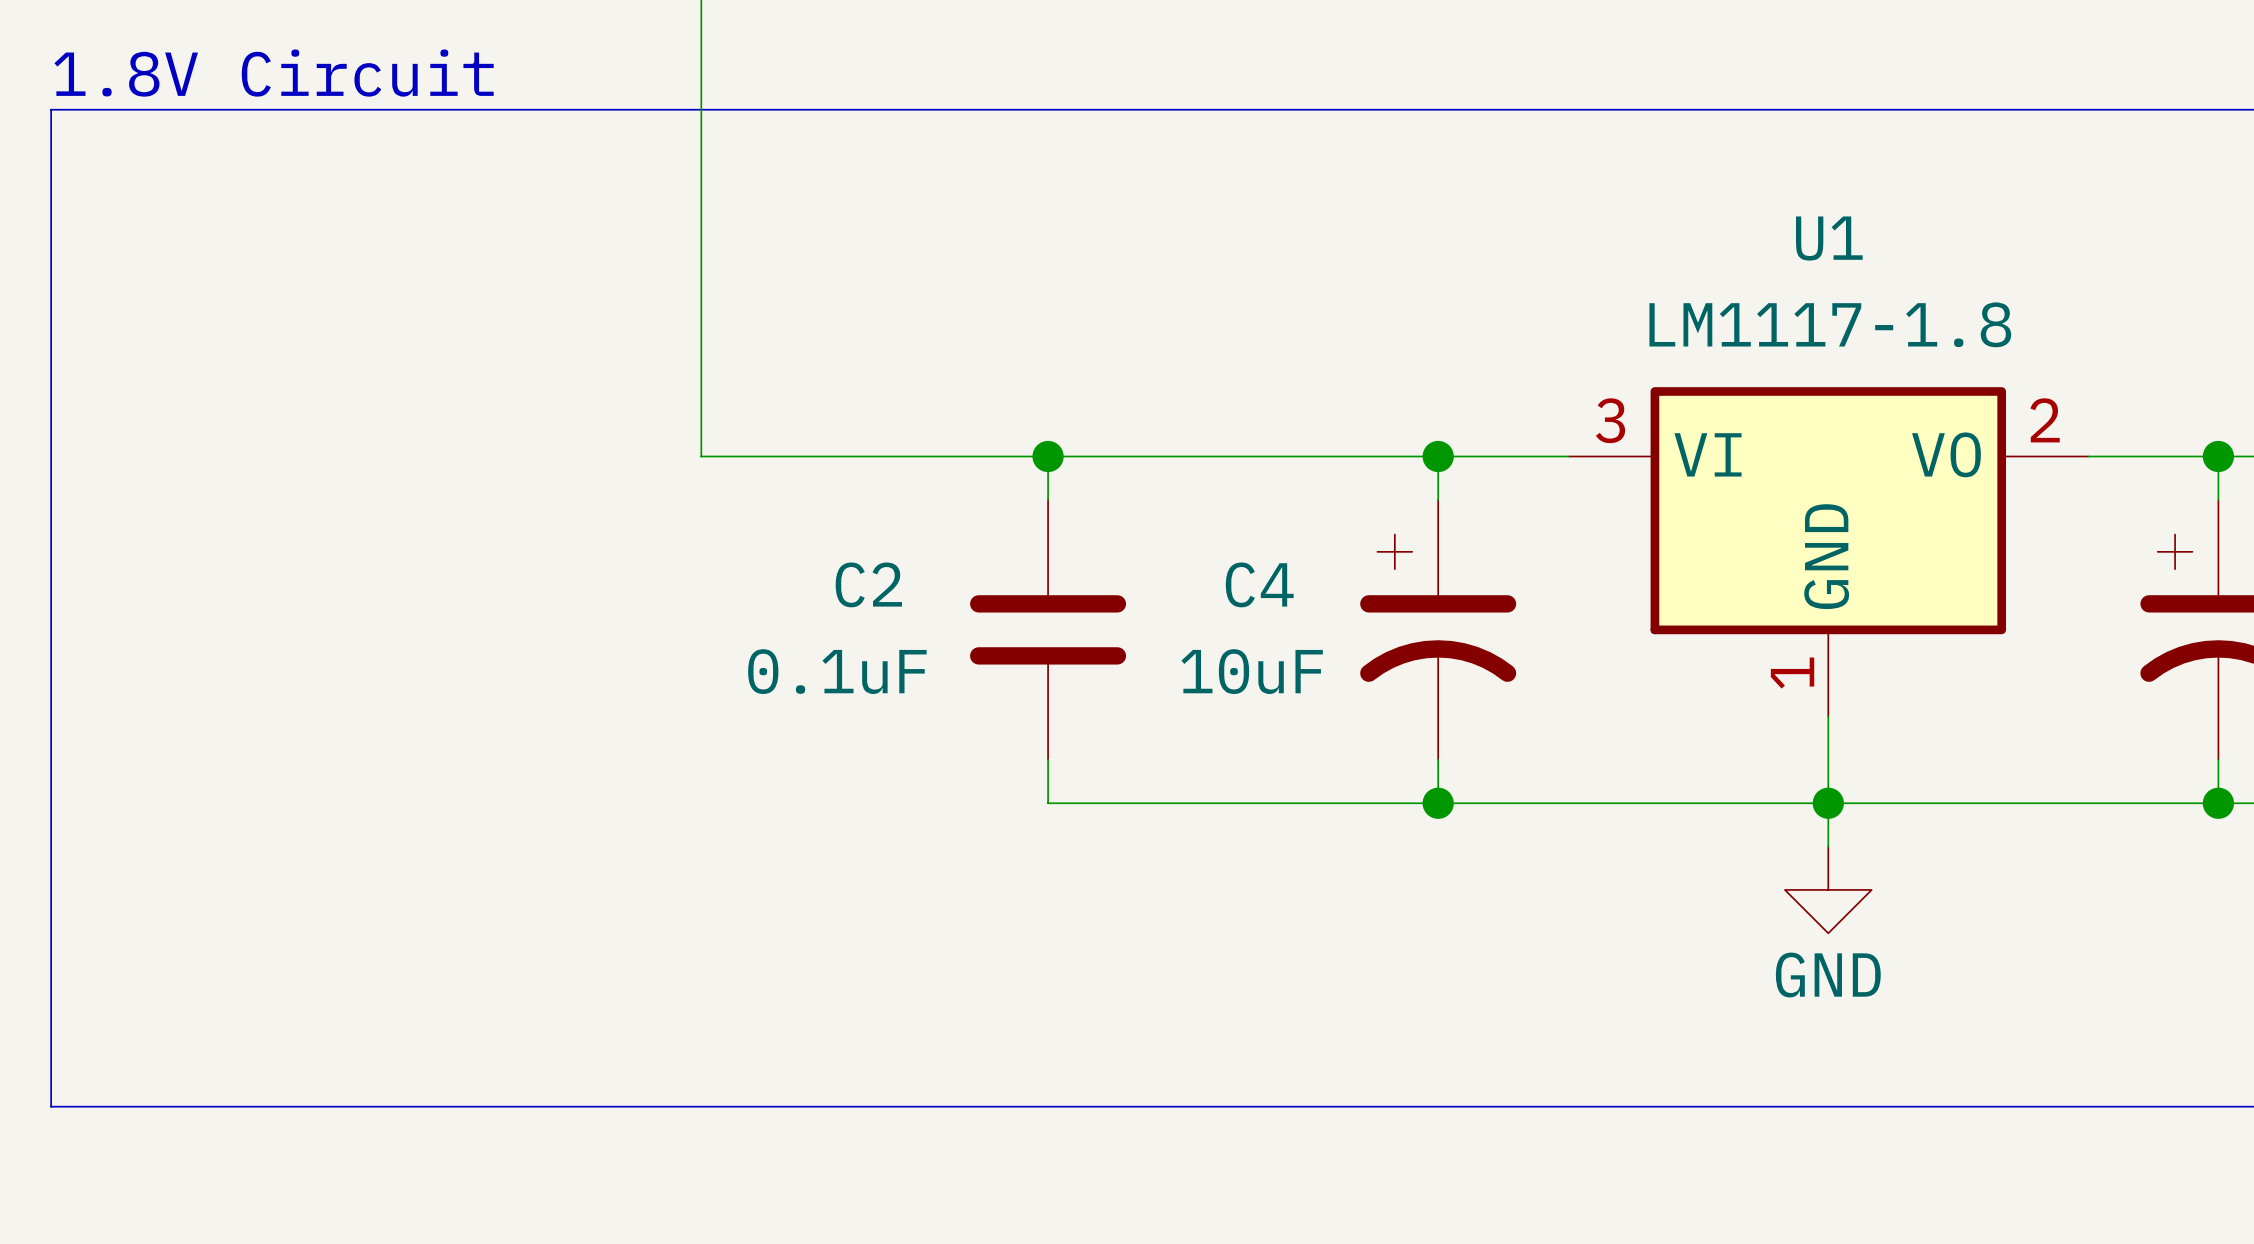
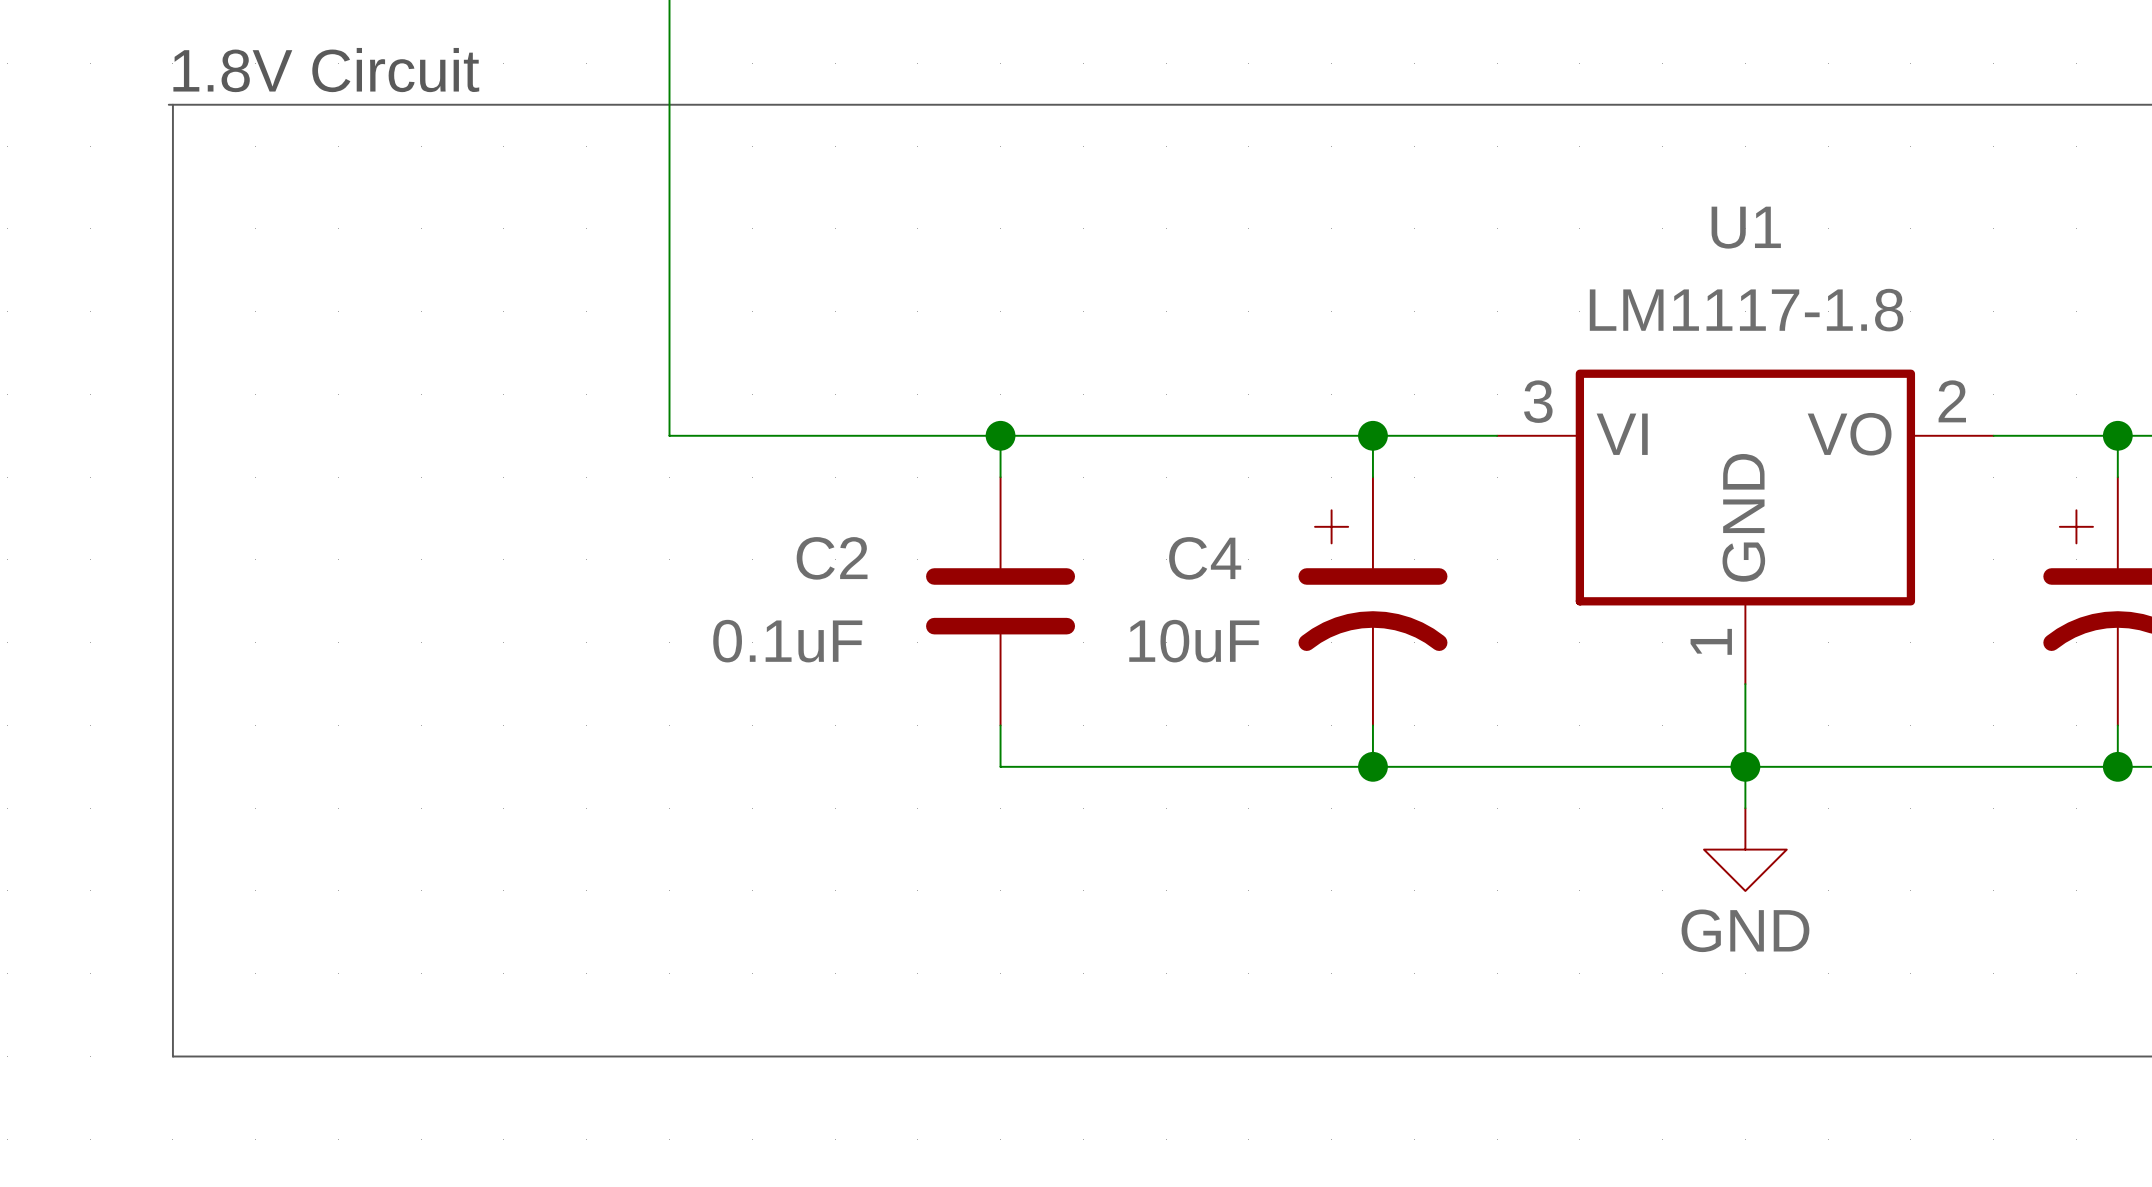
text position: 1.8V Circuit (274, 73) -> 1.8V Circuit (326, 70)
line: (176, 109) (51, 109) (51, 1106) (181, 1106) -> (172, 104) (172, 1056)

